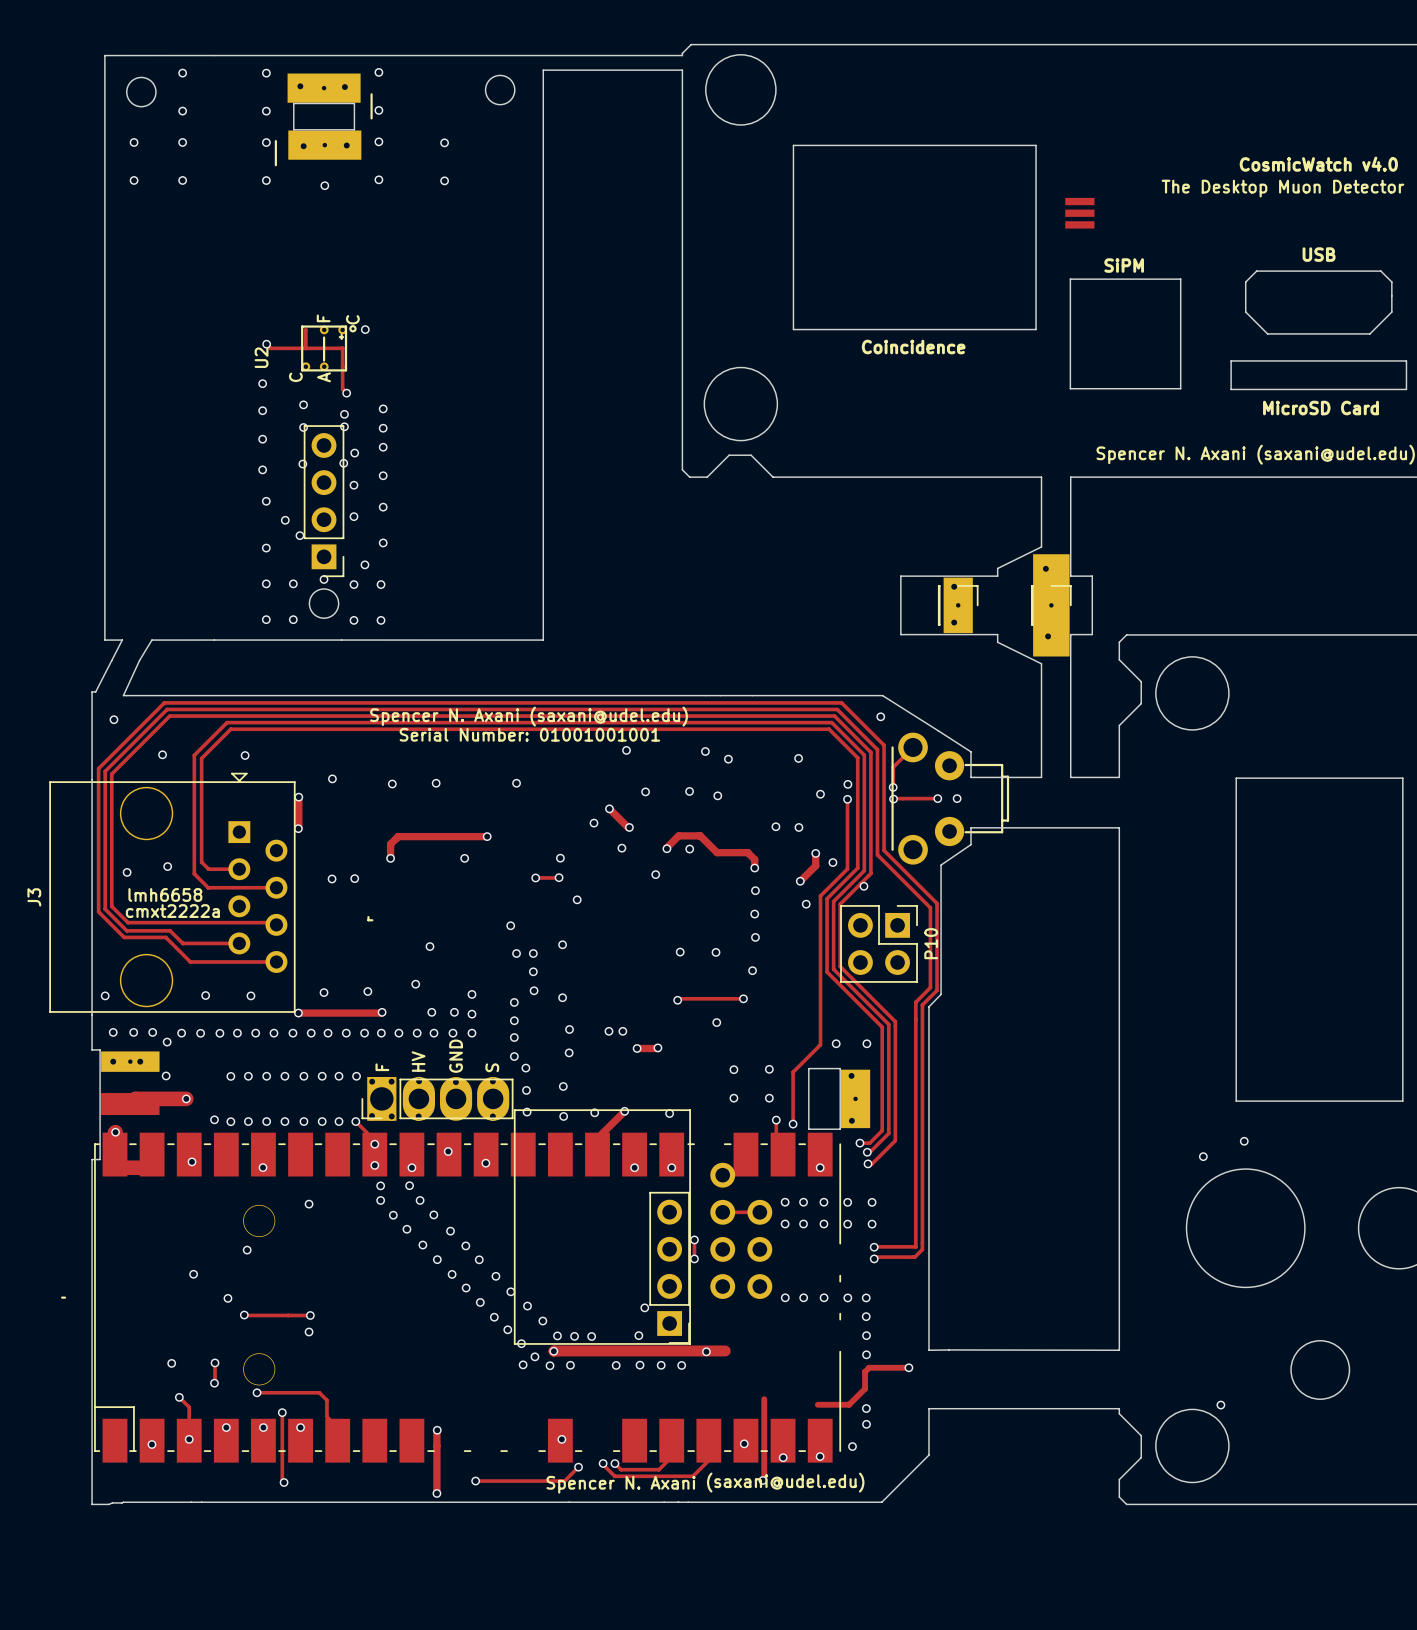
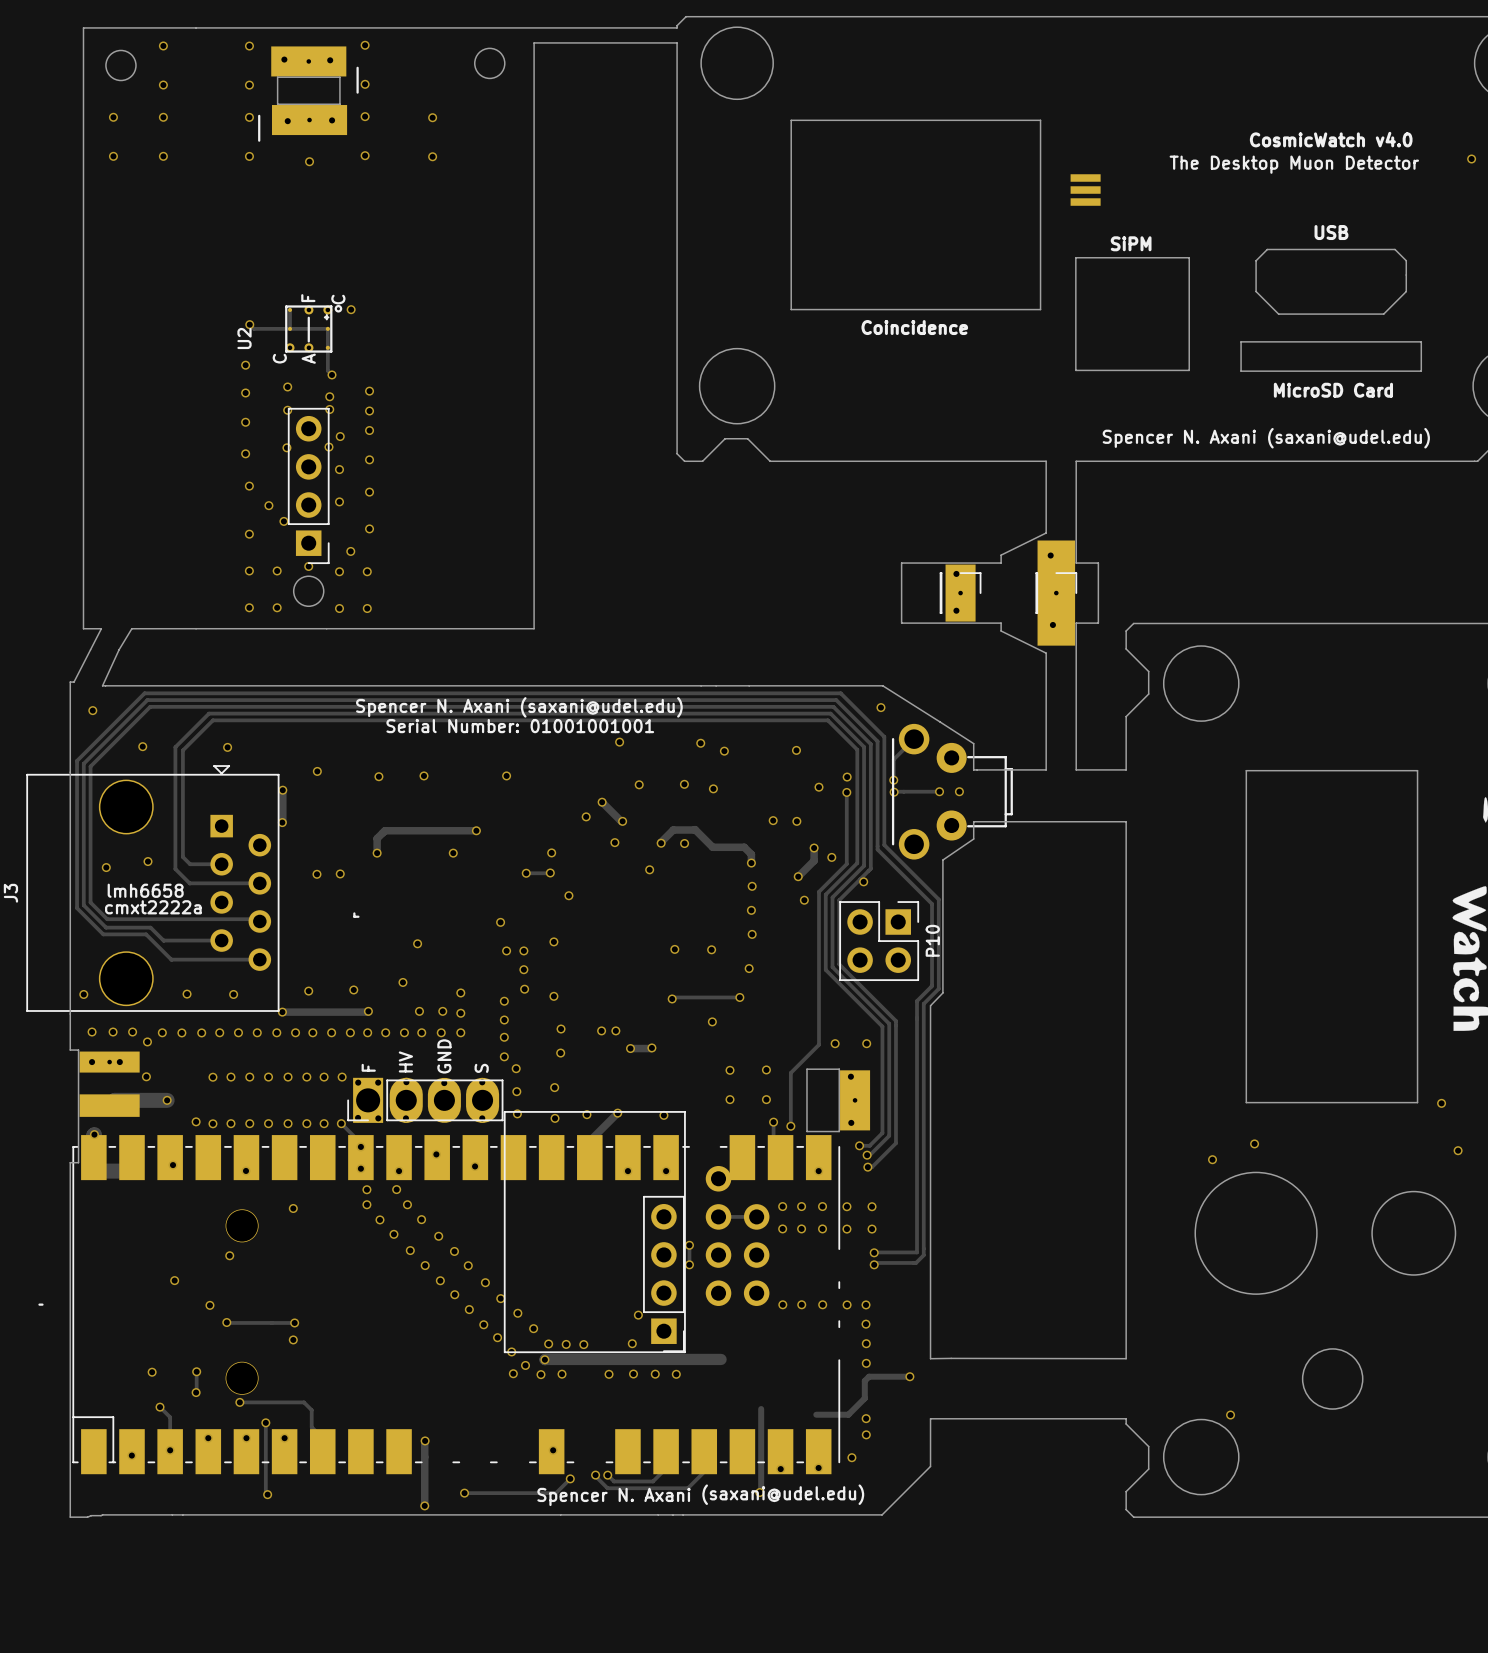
via: (706, 1351) -> none
via: (744, 1443) -> none

